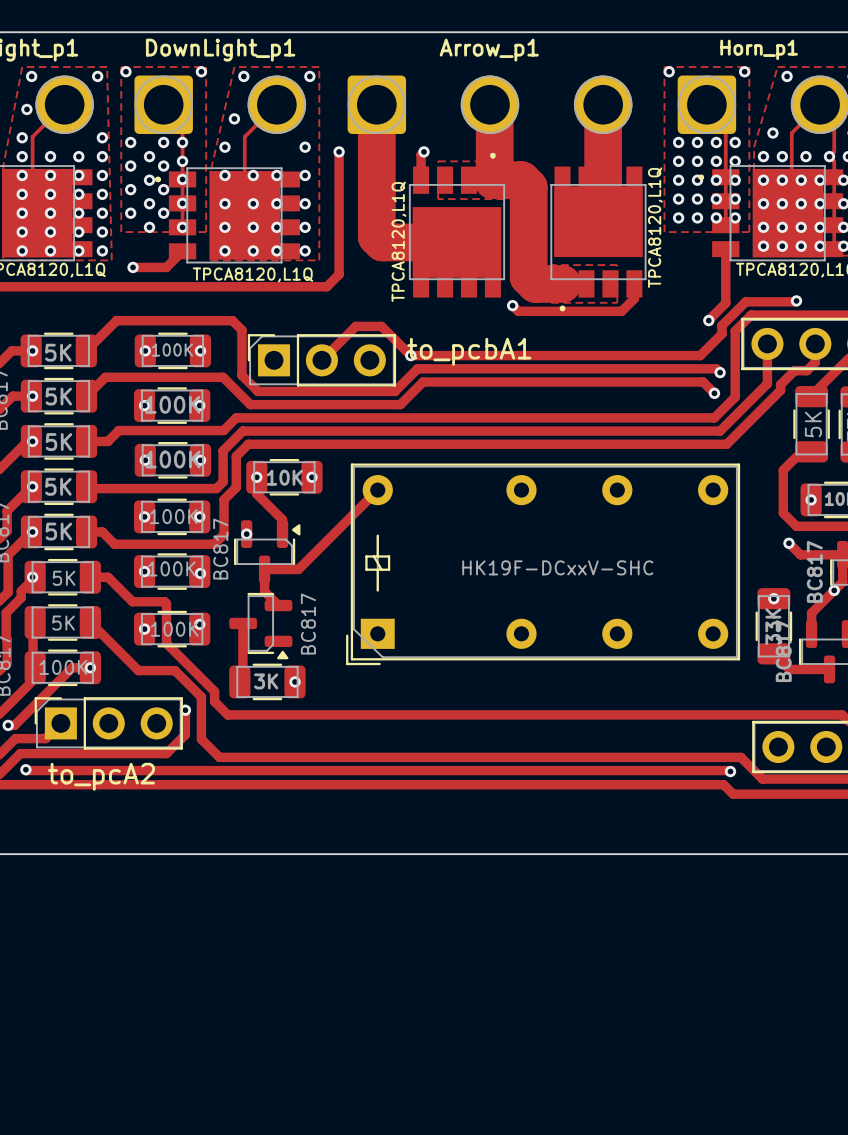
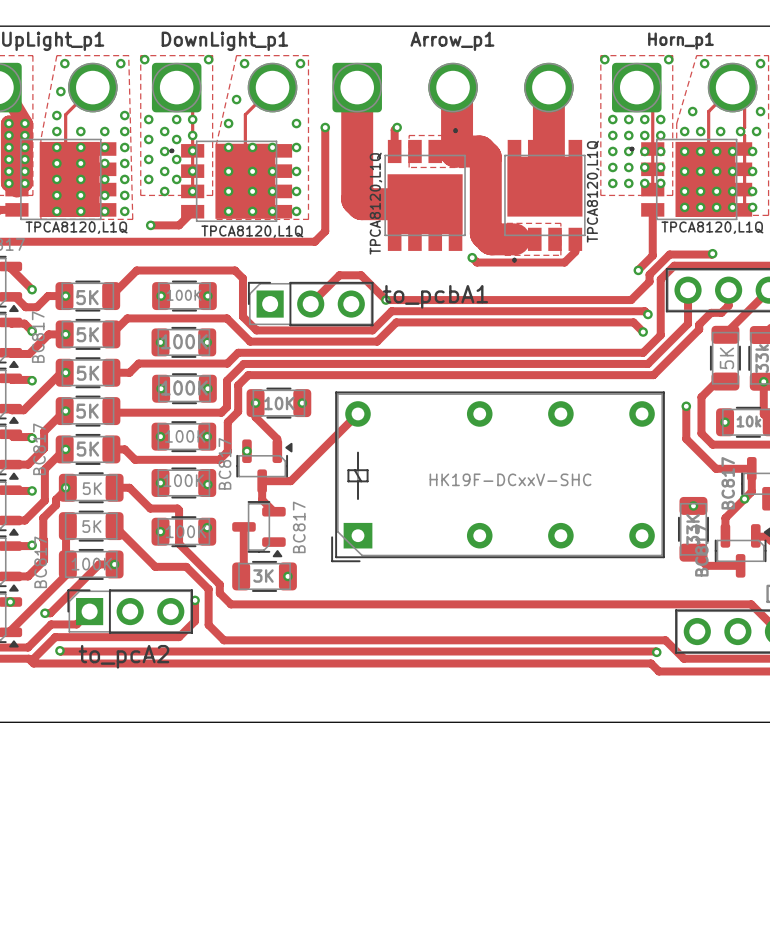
track: none -> (686, 406) (686, 439) (706, 459)
via position: (788, 543) -> (686, 406)

